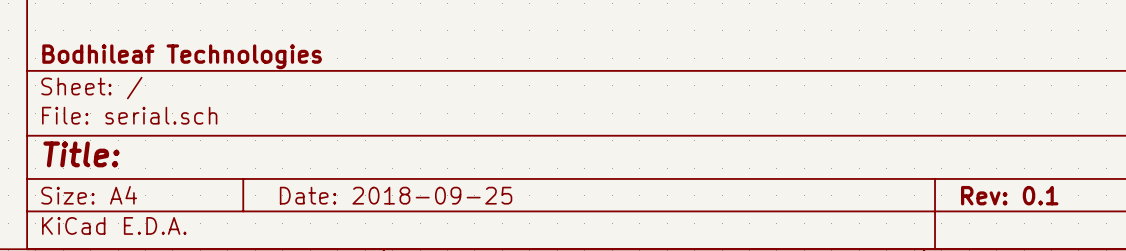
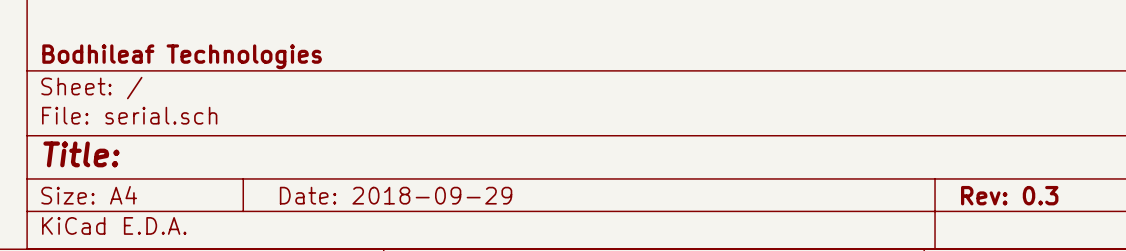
title block: Date: 2018-09-25 (396, 195) -> Date: 2018-09-29 (396, 195)
title block: Rev: 0.1 (1009, 195) -> Rev: 0.3 (1009, 195)

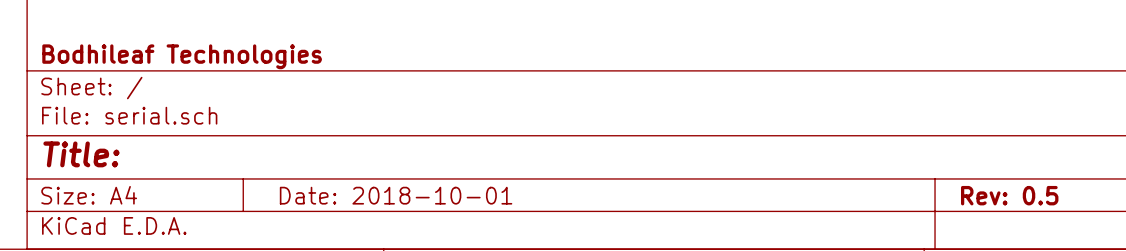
title block: Date: 2018-09-29 (396, 195) -> Date: 2018-10-01 (396, 195)
title block: Rev: 0.3 (1009, 195) -> Rev: 0.5 (1009, 195)

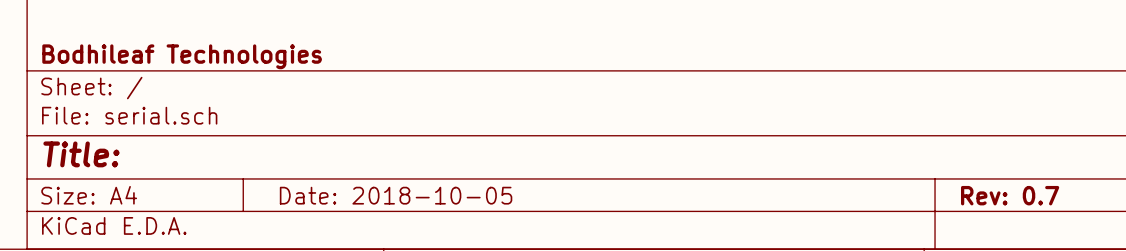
title block: Date: 2018-10-01 (396, 195) -> Date: 2018-10-05 (396, 195)
title block: Rev: 0.5 (1009, 195) -> Rev: 0.7 (1010, 195)

